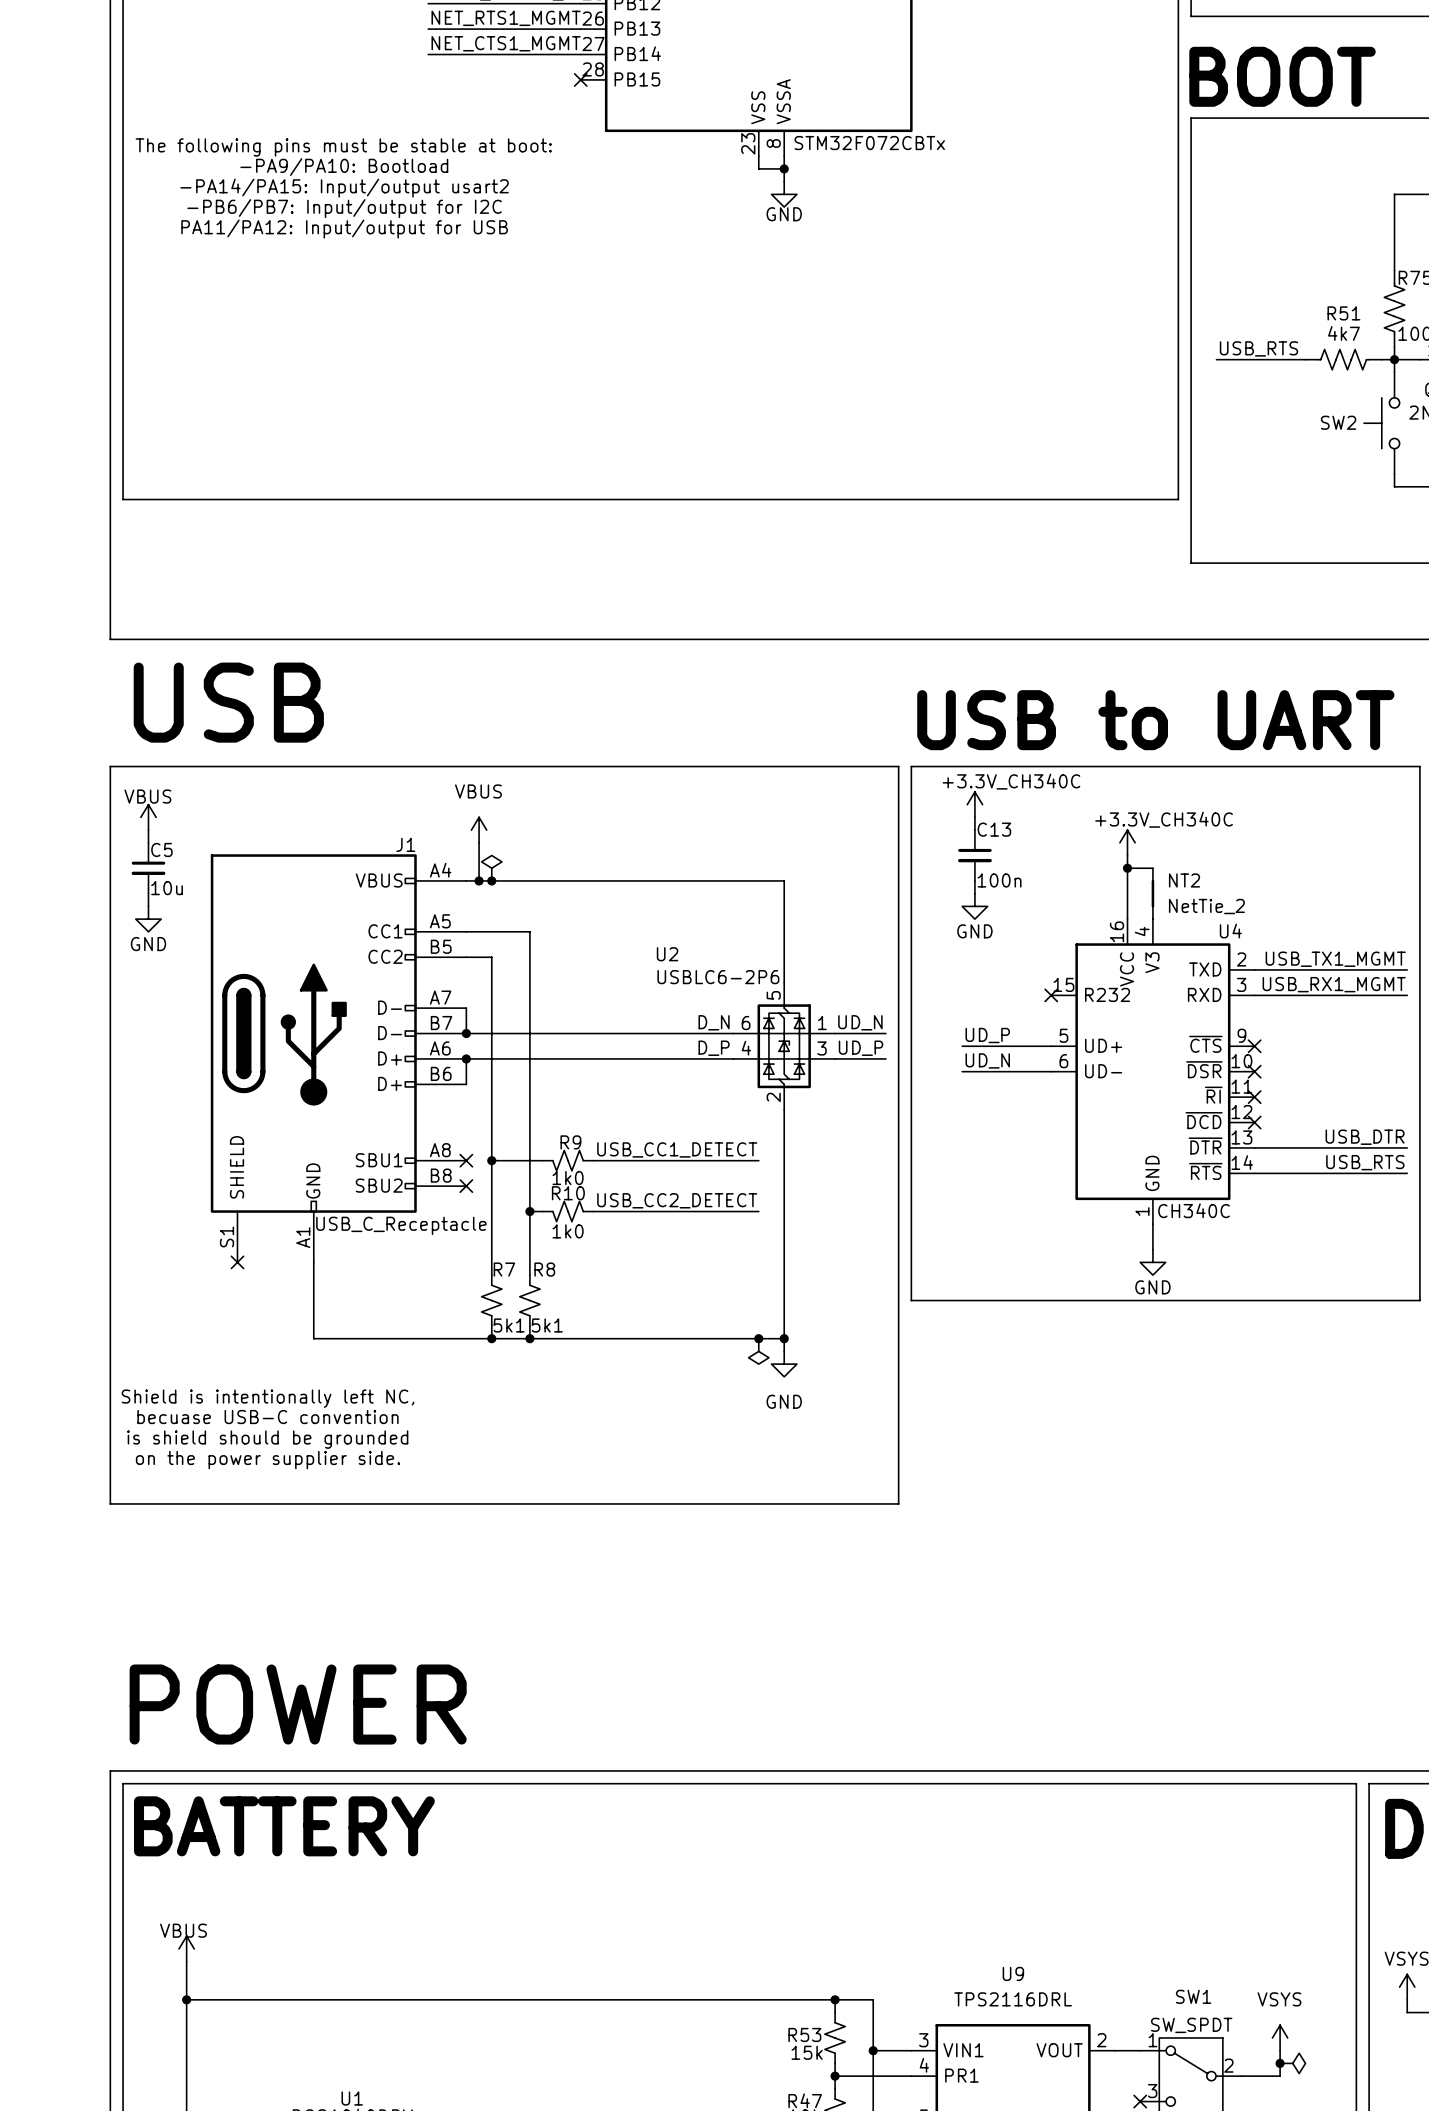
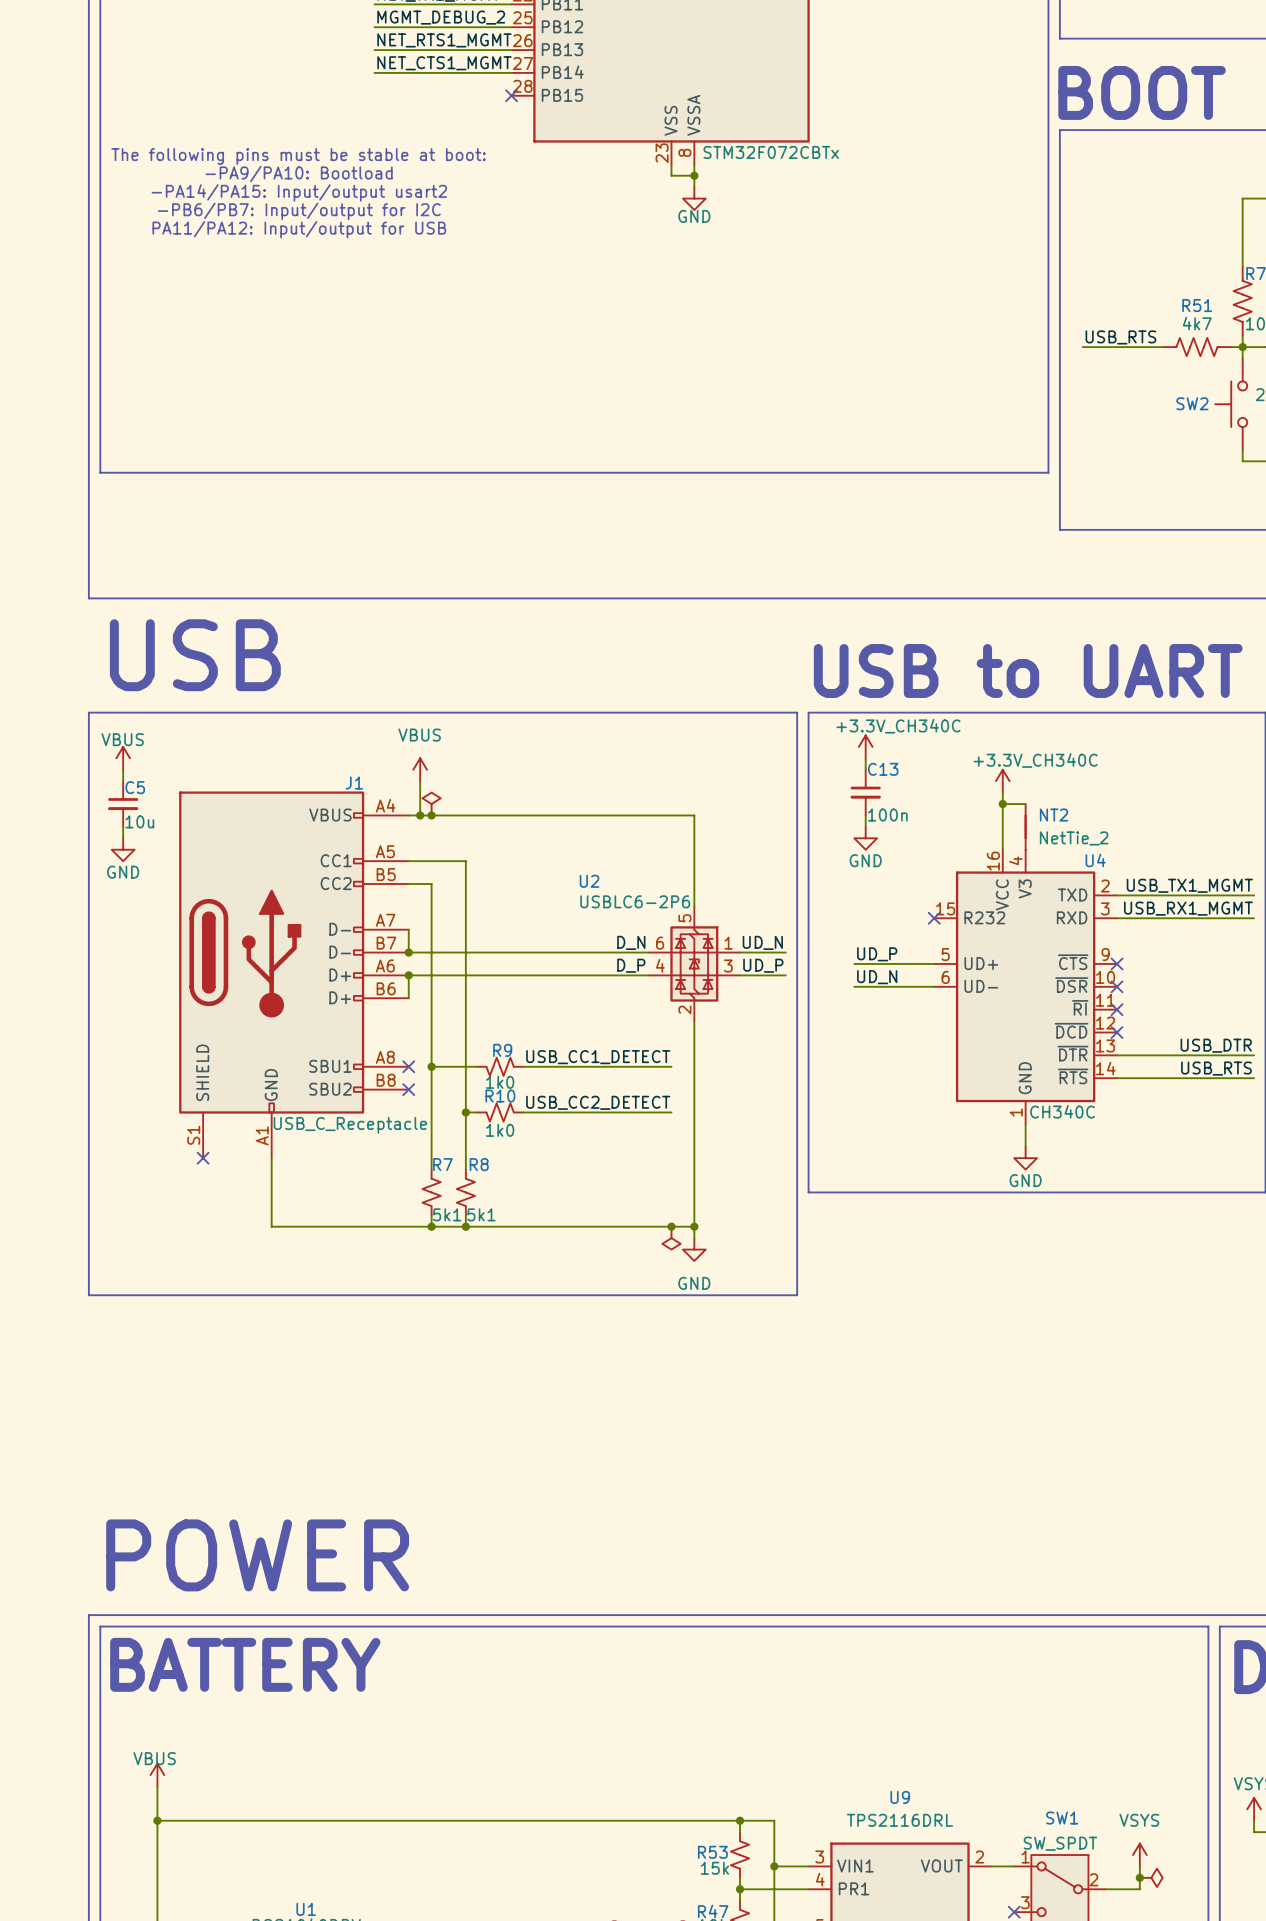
text: Shield is intentionally left NC, (268, 1398) -> none
line: (110, 1414) (110, 1503) (898, 1503) (898, 1414) -> (88, 1295) (797, 1295)
text: becuase USB-C convention (268, 1417) -> none
text: is shield should be grounded (267, 1439) -> none
text: on the power supplier side. (268, 1460) -> none

